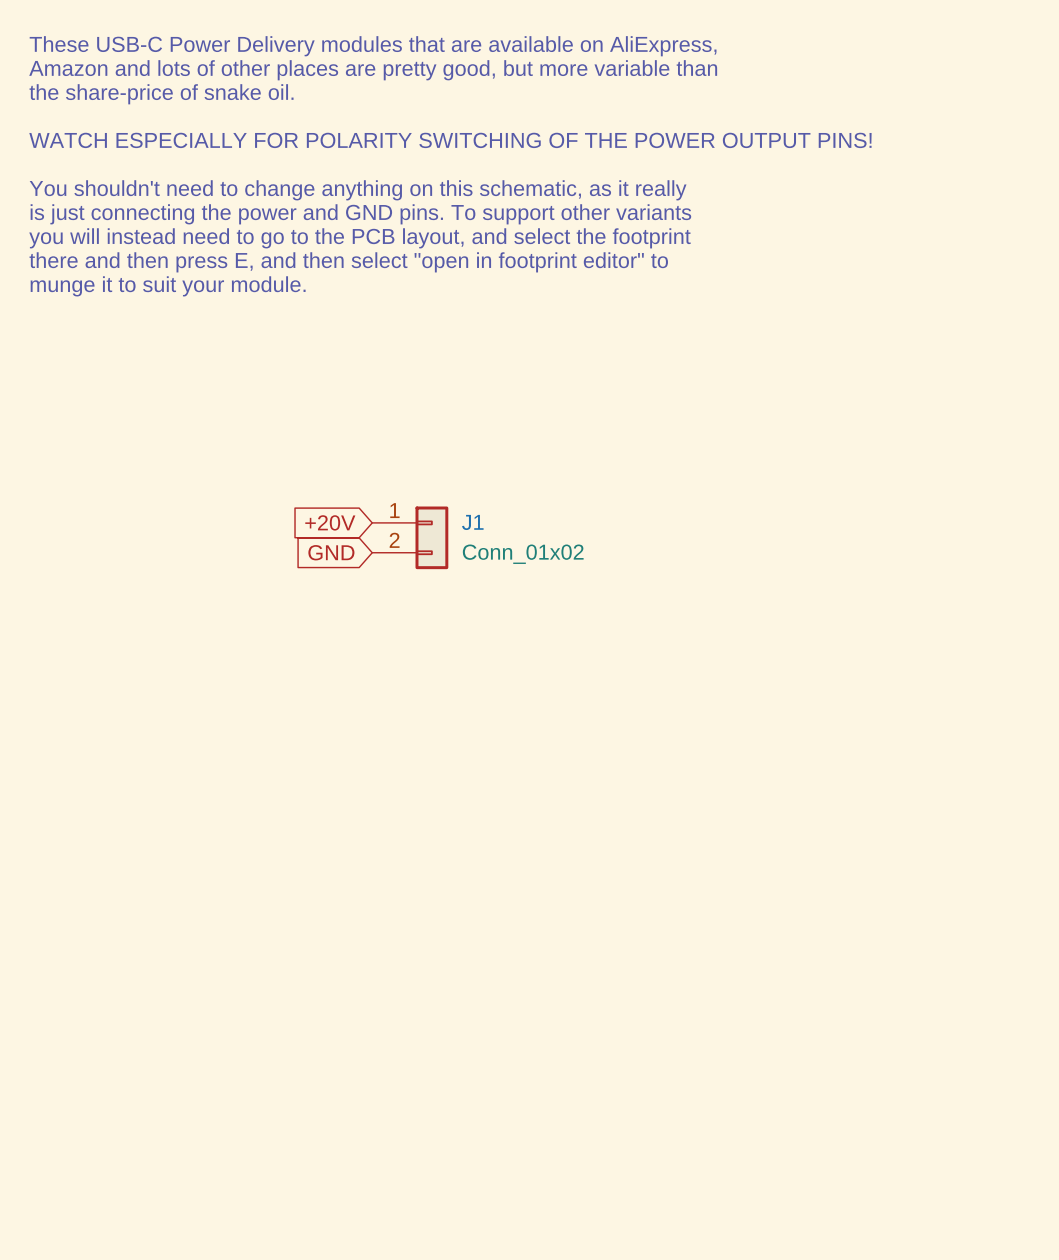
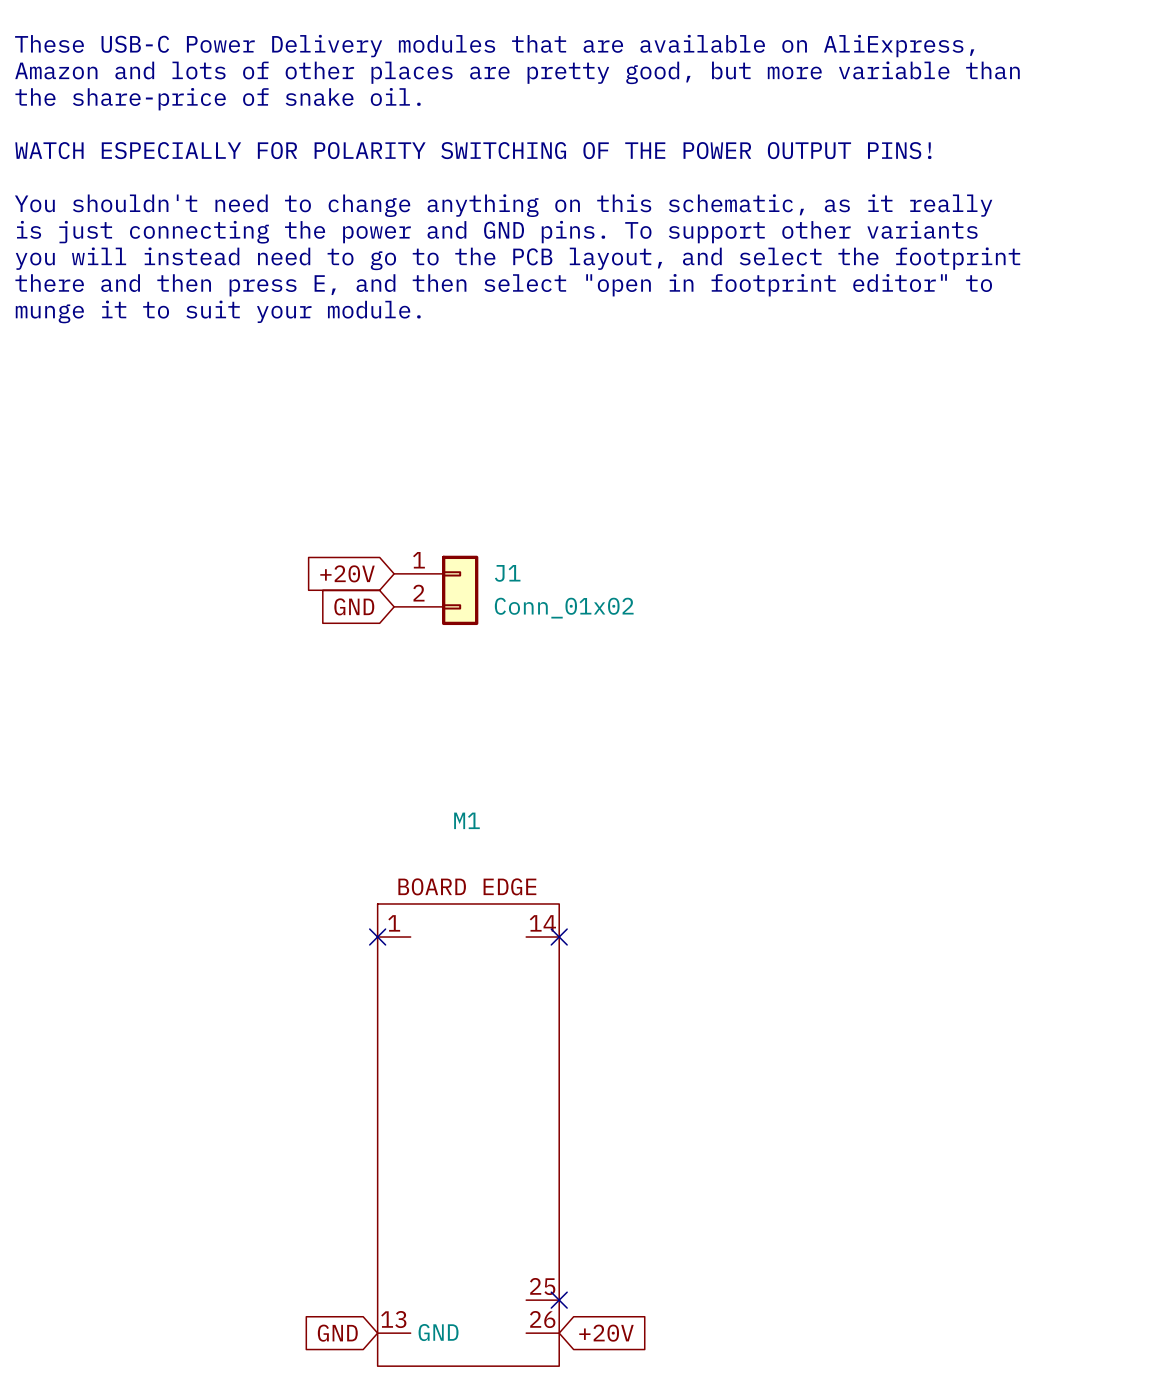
no-connect mark: none -> (377, 937)
no-connect mark: none -> (559, 937)
M1: none -> (468, 1135)
no-connect mark: none -> (559, 1300)
global label: none -> GND (337, 1333)
global label: none -> +20V (606, 1333)

